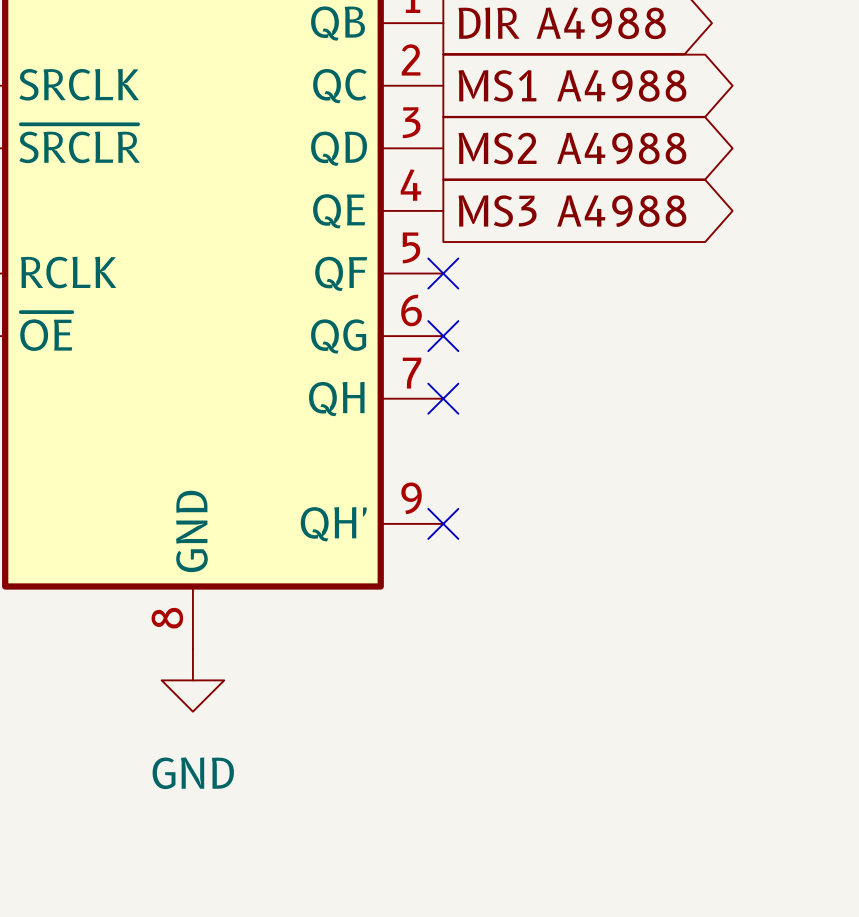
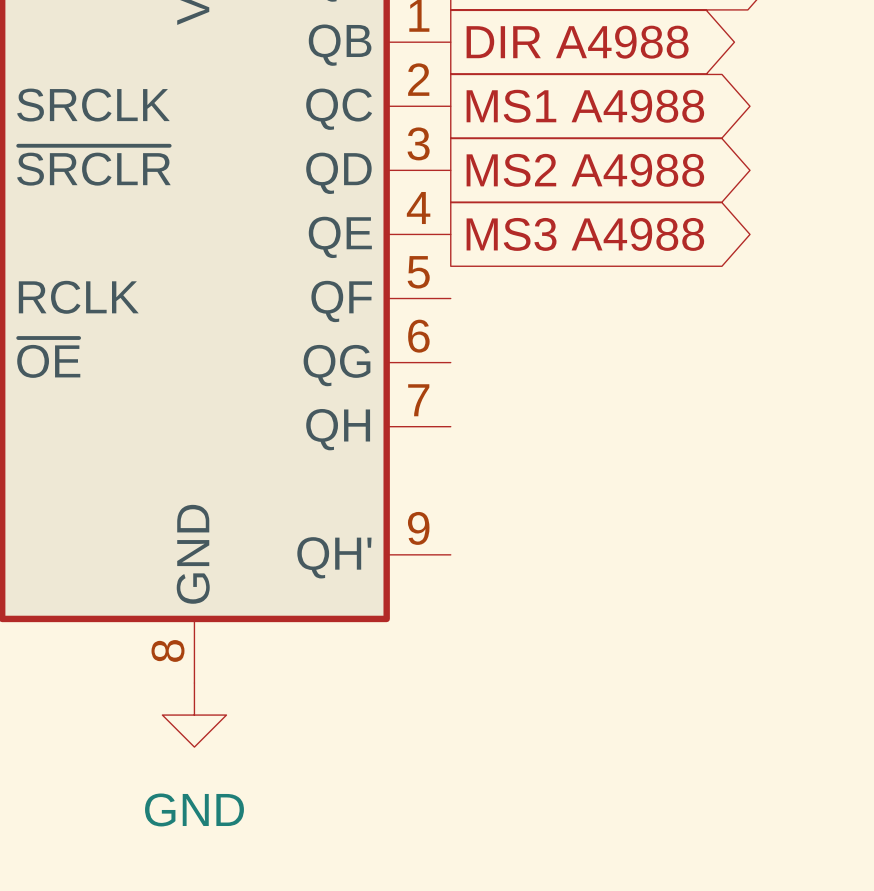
no-connect mark: (443, 273) -> none
no-connect mark: (443, 336) -> none
no-connect mark: (443, 398) -> none
no-connect mark: (443, 523) -> none

